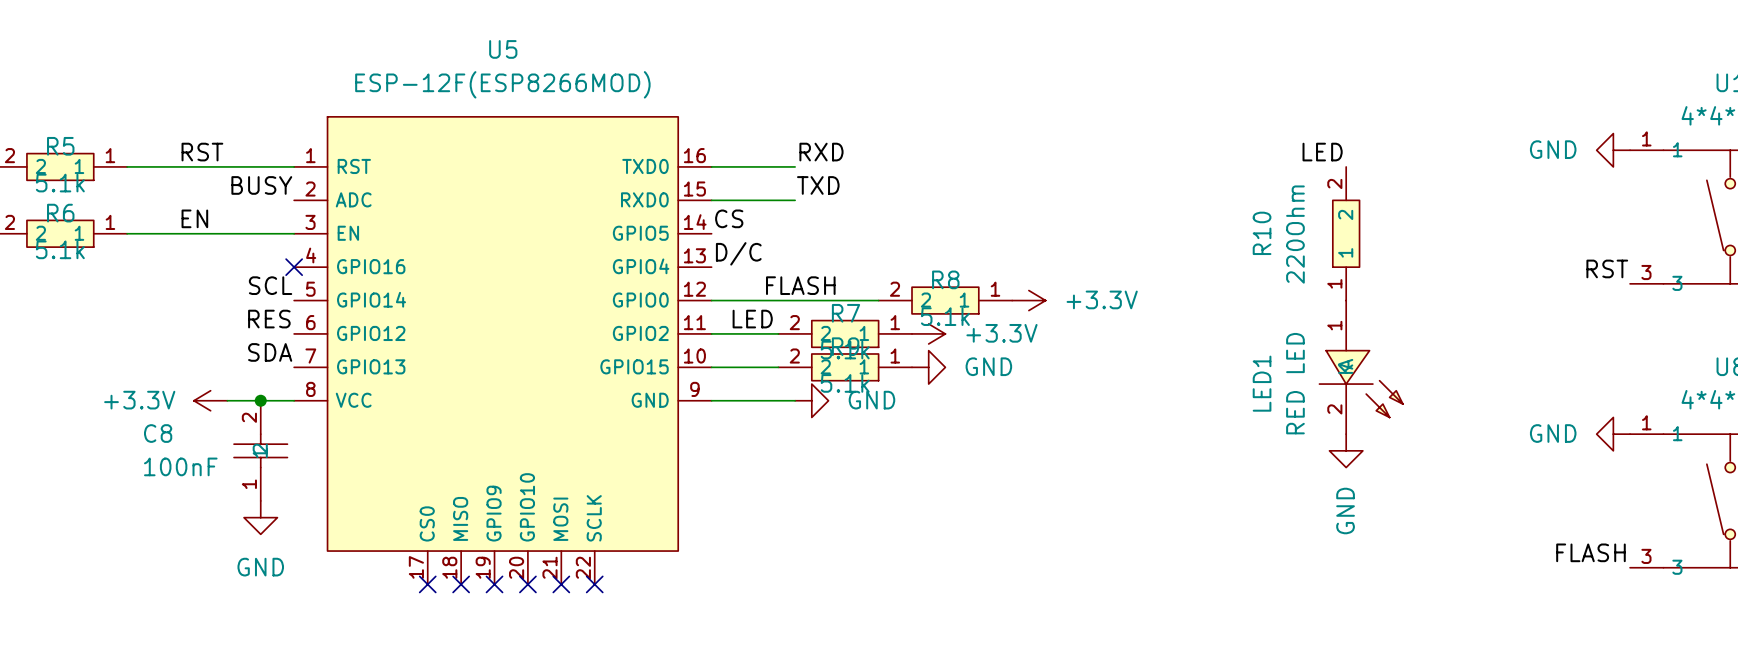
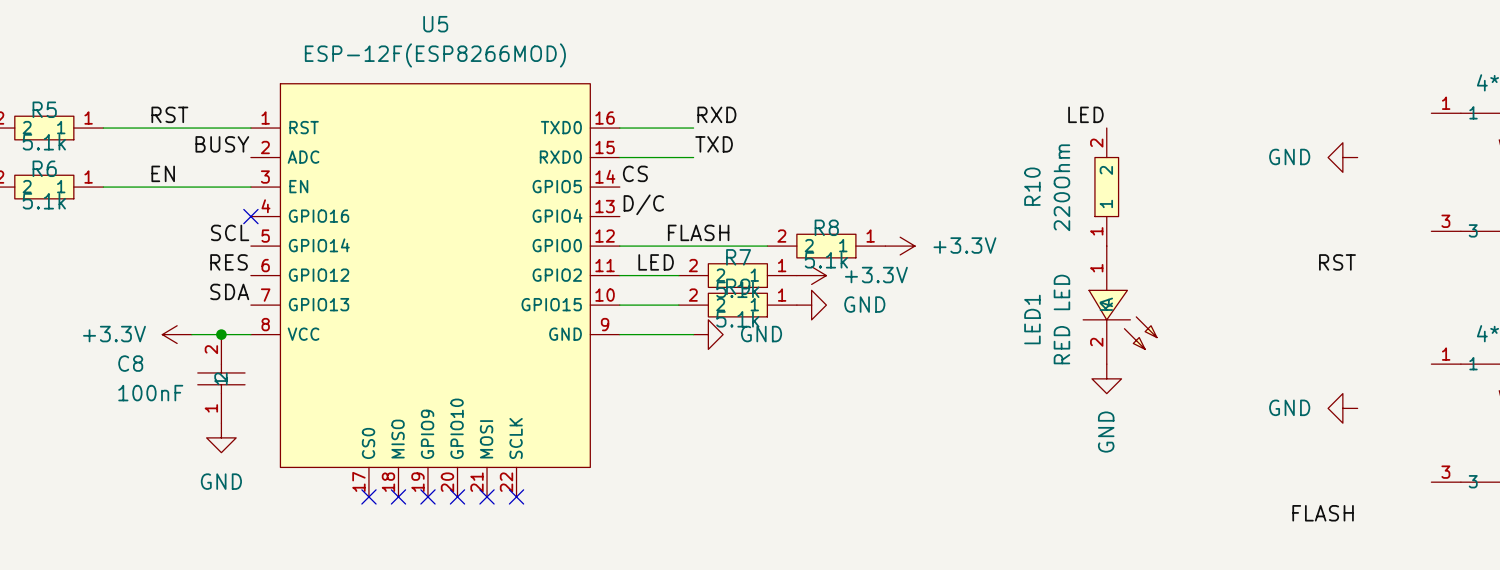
power symbol position: GND (1613, 150) -> GND (1342, 157)
label position: LED (1322, 152) -> LED (1085, 114)
R10 position: (1346, 233) -> (1106, 187)
label position: RST (1607, 268) -> RST (1337, 262)
LED1 position: (1361, 367) -> (1120, 305)
power symbol: GND (1613, 434) -> none
power symbol position: GND (1346, 450) -> GND (1106, 378)
power symbol: none -> GND (1342, 408)
label position: FLASH (1590, 552) -> FLASH (1323, 513)

